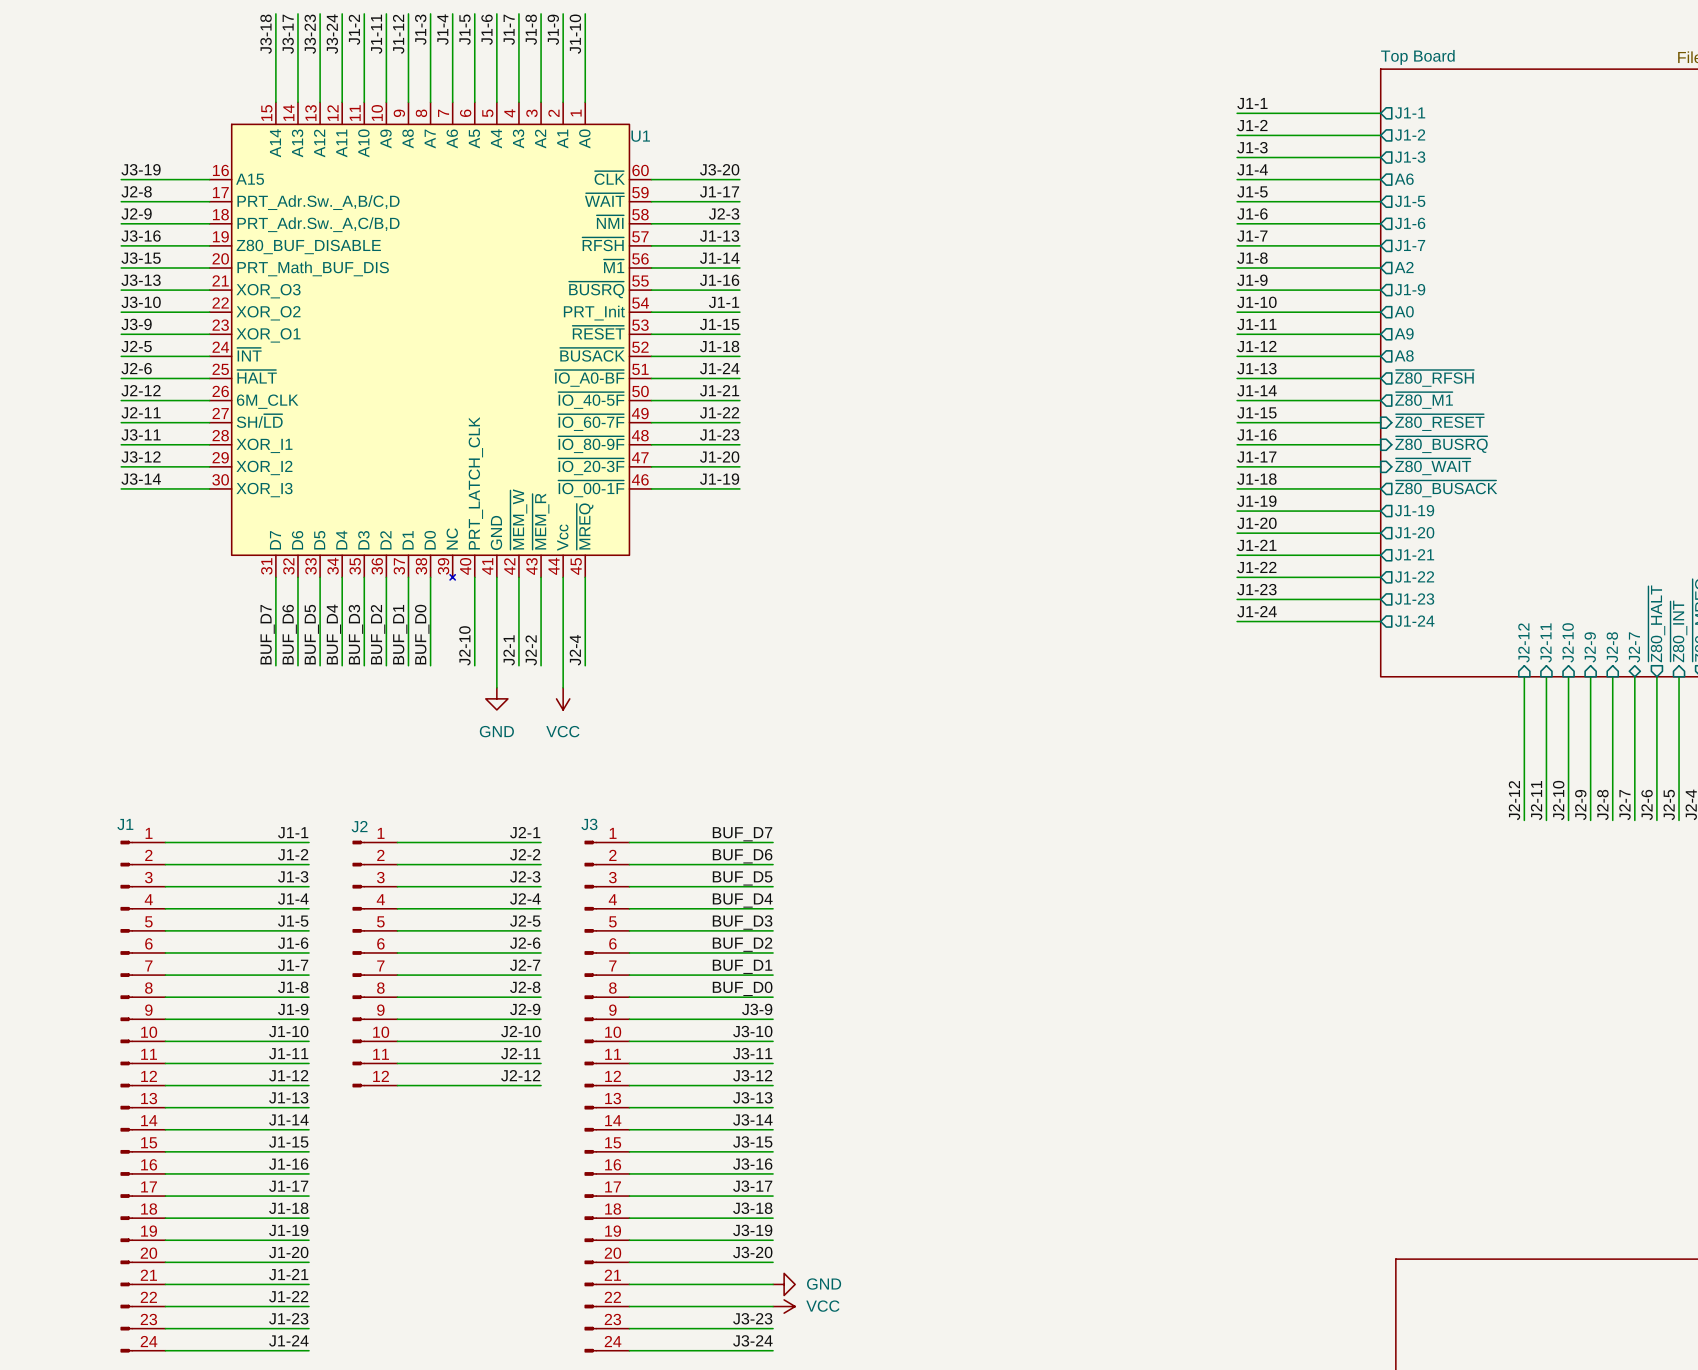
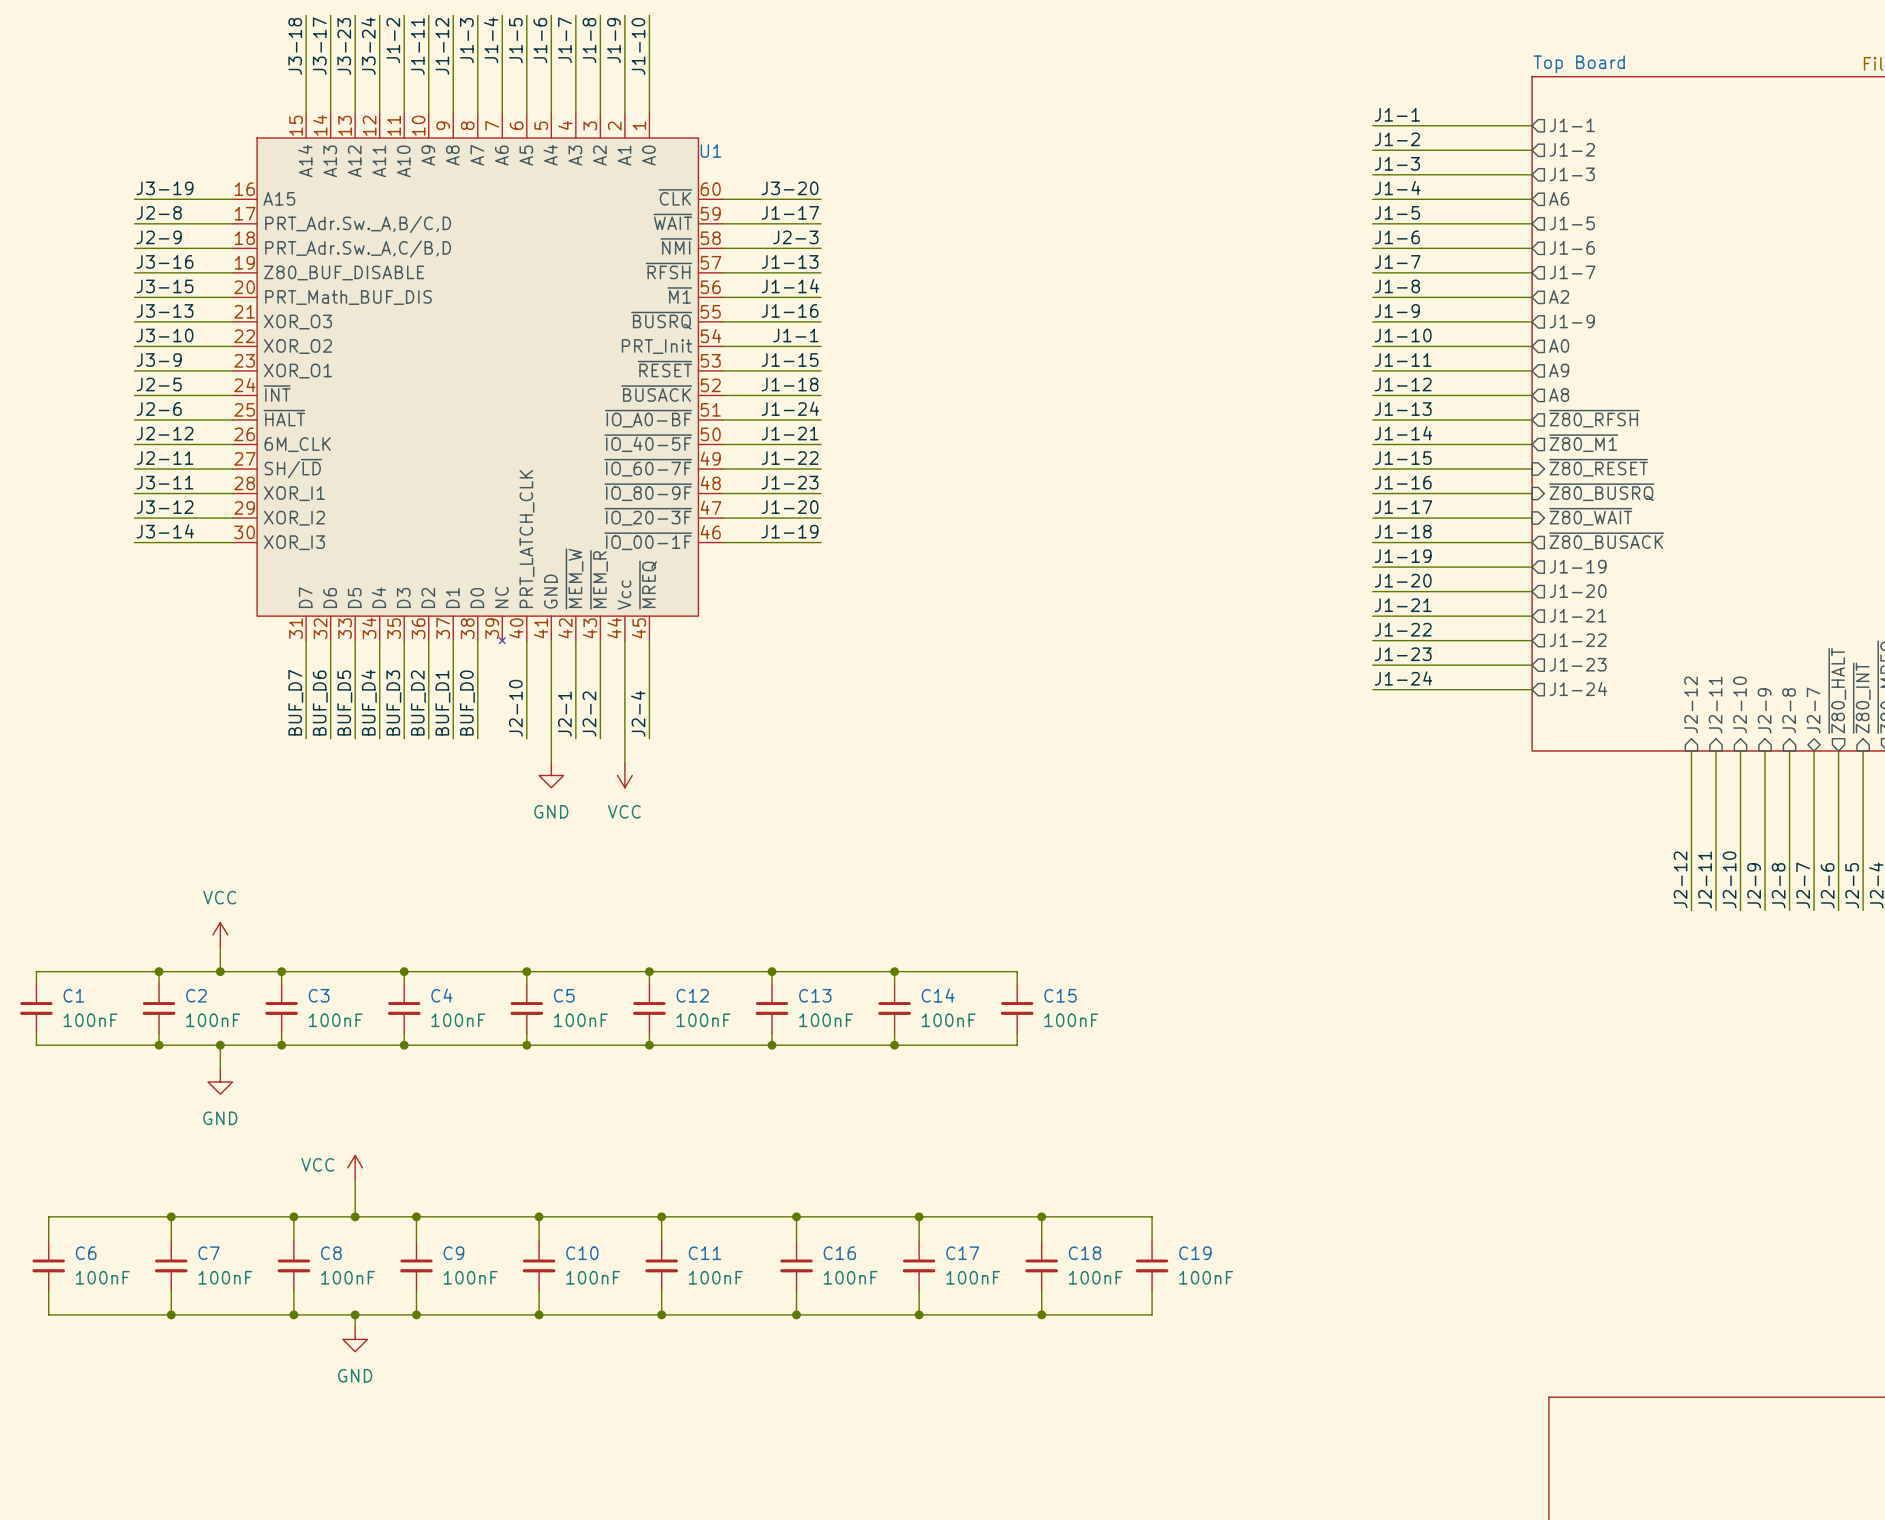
label: J1-1 (293, 832) -> none
label: J2-1 (525, 832) -> none
label: BUF_D7 (742, 834) -> none
wire: (165, 842) (309, 842) -> none
power symbol: none -> VCC (220, 934)
wire: (397, 842) (541, 842) -> none
wire: (629, 842) (773, 842) -> none
wire: none -> (220, 947) (220, 971)
label: J1-2 (293, 854) -> none
label: J2-2 (525, 854) -> none
label: BUF_D6 (742, 856) -> none
wire: (165, 864) (309, 864) -> none
wire: (397, 864) (541, 864) -> none
wire: (629, 864) (773, 864) -> none
wire: none -> (159, 971) (159, 983)
junction: none -> (159, 971)
junction: none -> (220, 971)
wire: none -> (281, 971) (281, 983)
junction: none -> (281, 971)
wire: none -> (404, 971) (404, 983)
junction: none -> (404, 971)
wire: none -> (526, 971) (526, 983)
junction: none -> (526, 971)
wire: none -> (649, 971) (649, 983)
junction: none -> (649, 971)
wire: none -> (772, 971) (772, 983)
junction: none -> (772, 971)
wire: none -> (894, 971) (894, 983)
junction: none -> (894, 971)
label: J1-3 (293, 876) -> none
label: J2-3 (525, 876) -> none
label: BUF_D5 (742, 878) -> none
wire: none -> (36, 983) (36, 971) (1017, 971) (1017, 983)
wire: (165, 886) (309, 886) -> none
wire: (397, 886) (541, 886) -> none
wire: (629, 886) (773, 886) -> none
label: J2-4 (525, 898) -> none
label: J1-4 (293, 899) -> none
label: BUF_D4 (742, 900) -> none
C1: none -> 100nF (36, 1008)
C2: none -> 100nF (159, 1008)
wire: (165, 908) (309, 908) -> none
C3: none -> 100nF (281, 1008)
C4: none -> 100nF (404, 1008)
wire: (397, 908) (541, 908) -> none
C5: none -> 100nF (526, 1008)
C12: none -> 100nF (649, 1008)
wire: (629, 908) (773, 908) -> none
C13: none -> 100nF (772, 1008)
C14: none -> 100nF (894, 1008)
C15: none -> 100nF (1017, 1008)
label: J1-5 (293, 921) -> none
label: J2-5 (525, 921) -> none
label: BUF_D3 (742, 922) -> none
wire: none -> (36, 1032) (36, 1045) (1017, 1045) (1017, 1032)
wire: none -> (159, 1032) (159, 1045)
wire: (165, 930) (309, 930) -> none
wire: none -> (281, 1032) (281, 1045)
wire: none -> (404, 1032) (404, 1045)
wire: (397, 930) (541, 930) -> none
wire: none -> (526, 1032) (526, 1045)
wire: none -> (649, 1032) (649, 1045)
wire: (629, 930) (773, 930) -> none
wire: none -> (772, 1032) (772, 1045)
wire: none -> (894, 1032) (894, 1045)
junction: none -> (159, 1045)
wire: none -> (220, 1045) (220, 1069)
junction: none -> (220, 1045)
junction: none -> (281, 1045)
junction: none -> (404, 1045)
junction: none -> (526, 1045)
junction: none -> (649, 1045)
junction: none -> (772, 1045)
junction: none -> (894, 1045)
label: J1-6 (293, 943) -> none
label: J2-6 (525, 943) -> none
label: BUF_D2 (742, 944) -> none
wire: (165, 952) (309, 952) -> none
wire: (397, 952) (541, 952) -> none
wire: (629, 952) (773, 952) -> none
J2: (375, 964) -> none
label: J1-7 (293, 965) -> none
label: J2-7 (525, 965) -> none
label: BUF_D1 (742, 966) -> none
wire: (165, 975) (309, 975) -> none
power symbol: none -> GND (220, 1081)
wire: (397, 975) (541, 975) -> none
wire: (629, 975) (773, 975) -> none
label: J1-8 (293, 987) -> none
label: J2-8 (525, 987) -> none
label: BUF_D0 (742, 988) -> none
wire: (165, 997) (309, 997) -> none
wire: (397, 997) (541, 997) -> none
wire: (629, 997) (773, 997) -> none
label: J1-9 (293, 1009) -> none
label: J2-9 (525, 1009) -> none
label: J3-9 (757, 1009) -> none
wire: (165, 1019) (309, 1019) -> none
wire: (397, 1019) (541, 1019) -> none
wire: (629, 1019) (773, 1019) -> none
label: J1-10 (288, 1031) -> none
label: J2-10 (520, 1031) -> none
label: J3-10 (752, 1031) -> none
wire: (165, 1041) (309, 1041) -> none
wire: (397, 1041) (541, 1041) -> none
wire: (629, 1041) (773, 1041) -> none
power symbol: none -> VCC (355, 1167)
label: J1-11 (288, 1053) -> none
label: J2-11 (520, 1053) -> none
label: J3-11 (752, 1053) -> none
wire: (165, 1063) (309, 1063) -> none
wire: none -> (355, 1180) (355, 1216)
wire: (397, 1063) (541, 1063) -> none
wire: (629, 1063) (773, 1063) -> none
label: J1-12 (288, 1075) -> none
label: J2-12 (520, 1075) -> none
label: J3-12 (752, 1075) -> none
wire: (165, 1085) (309, 1085) -> none
wire: (397, 1085) (541, 1085) -> none
wire: (629, 1085) (773, 1085) -> none
J1: (142, 1096) -> none
wire: none -> (171, 1216) (171, 1241)
junction: none -> (171, 1216)
wire: none -> (293, 1216) (293, 1241)
junction: none -> (293, 1216)
junction: none -> (355, 1216)
wire: none -> (416, 1216) (416, 1241)
junction: none -> (416, 1216)
wire: none -> (539, 1216) (539, 1241)
junction: none -> (539, 1216)
wire: none -> (661, 1216) (661, 1241)
junction: none -> (661, 1216)
J3: (607, 1096) -> none
wire: none -> (796, 1216) (796, 1241)
junction: none -> (796, 1216)
wire: none -> (919, 1216) (919, 1241)
junction: none -> (919, 1216)
wire: none -> (1041, 1216) (1041, 1241)
junction: none -> (1041, 1216)
label: J1-13 (288, 1097) -> none
label: J3-13 (752, 1097) -> none
wire: (165, 1107) (309, 1107) -> none
wire: (629, 1107) (773, 1107) -> none
wire: none -> (48, 1241) (48, 1216) (1152, 1216) (1152, 1241)
label: J1-14 (288, 1119) -> none
label: J3-14 (752, 1119) -> none
wire: (165, 1129) (309, 1129) -> none
wire: (629, 1129) (773, 1129) -> none
C6: none -> 100nF (48, 1265)
C7: none -> 100nF (171, 1265)
C8: none -> 100nF (293, 1265)
C9: none -> 100nF (416, 1265)
C10: none -> 100nF (539, 1265)
C11: none -> 100nF (661, 1265)
C16: none -> 100nF (796, 1265)
C17: none -> 100nF (919, 1265)
C18: none -> 100nF (1041, 1265)
C19: none -> 100nF (1152, 1265)
label: J3-15 (752, 1141) -> none
label: J1-15 (288, 1142) -> none
wire: (165, 1151) (309, 1151) -> none
wire: (629, 1151) (773, 1151) -> none
wire: none -> (48, 1290) (48, 1314) (1152, 1314) (1152, 1290)
wire: none -> (171, 1290) (171, 1314)
wire: none -> (293, 1290) (293, 1314)
wire: none -> (416, 1290) (416, 1314)
wire: none -> (539, 1290) (539, 1314)
wire: none -> (661, 1290) (661, 1314)
wire: none -> (796, 1290) (796, 1314)
wire: none -> (919, 1290) (919, 1314)
wire: none -> (1041, 1290) (1041, 1314)
label: J1-16 (288, 1164) -> none
label: J3-16 (752, 1164) -> none
wire: (165, 1173) (309, 1173) -> none
wire: (629, 1173) (773, 1173) -> none
junction: none -> (171, 1314)
junction: none -> (293, 1314)
wire: none -> (355, 1314) (355, 1327)
junction: none -> (355, 1314)
junction: none -> (416, 1314)
junction: none -> (539, 1314)
junction: none -> (661, 1314)
junction: none -> (796, 1314)
junction: none -> (919, 1314)
junction: none -> (1041, 1314)
label: J1-17 (288, 1186) -> none
label: J3-17 (752, 1186) -> none
wire: (165, 1196) (309, 1196) -> none
wire: (629, 1196) (773, 1196) -> none
power symbol: none -> GND (355, 1339)
label: J1-18 (288, 1208) -> none
label: J3-18 (752, 1208) -> none
wire: (165, 1218) (309, 1218) -> none
wire: (629, 1218) (773, 1218) -> none
label: J1-19 (288, 1230) -> none
label: J3-19 (752, 1230) -> none
wire: (165, 1240) (309, 1240) -> none
wire: (629, 1240) (773, 1240) -> none
label: J1-20 (288, 1252) -> none
label: J3-20 (752, 1252) -> none
wire: (165, 1262) (309, 1262) -> none
wire: (629, 1262) (773, 1262) -> none
label: J1-21 (288, 1274) -> none
wire: (165, 1284) (309, 1284) -> none
wire: (629, 1284) (773, 1284) -> none
power symbol: GND (784, 1284) -> none
label: J1-22 (288, 1296) -> none
wire: (165, 1306) (309, 1306) -> none
wire: (629, 1306) (773, 1306) -> none
power symbol: VCC (784, 1306) -> none
label: J1-23 (288, 1318) -> none
label: J3-23 (752, 1318) -> none
wire: (165, 1328) (309, 1328) -> none
wire: (629, 1328) (773, 1328) -> none
label: J1-24 (288, 1340) -> none
label: J3-24 (752, 1340) -> none
wire: (165, 1350) (309, 1350) -> none
wire: (629, 1350) (773, 1350) -> none

